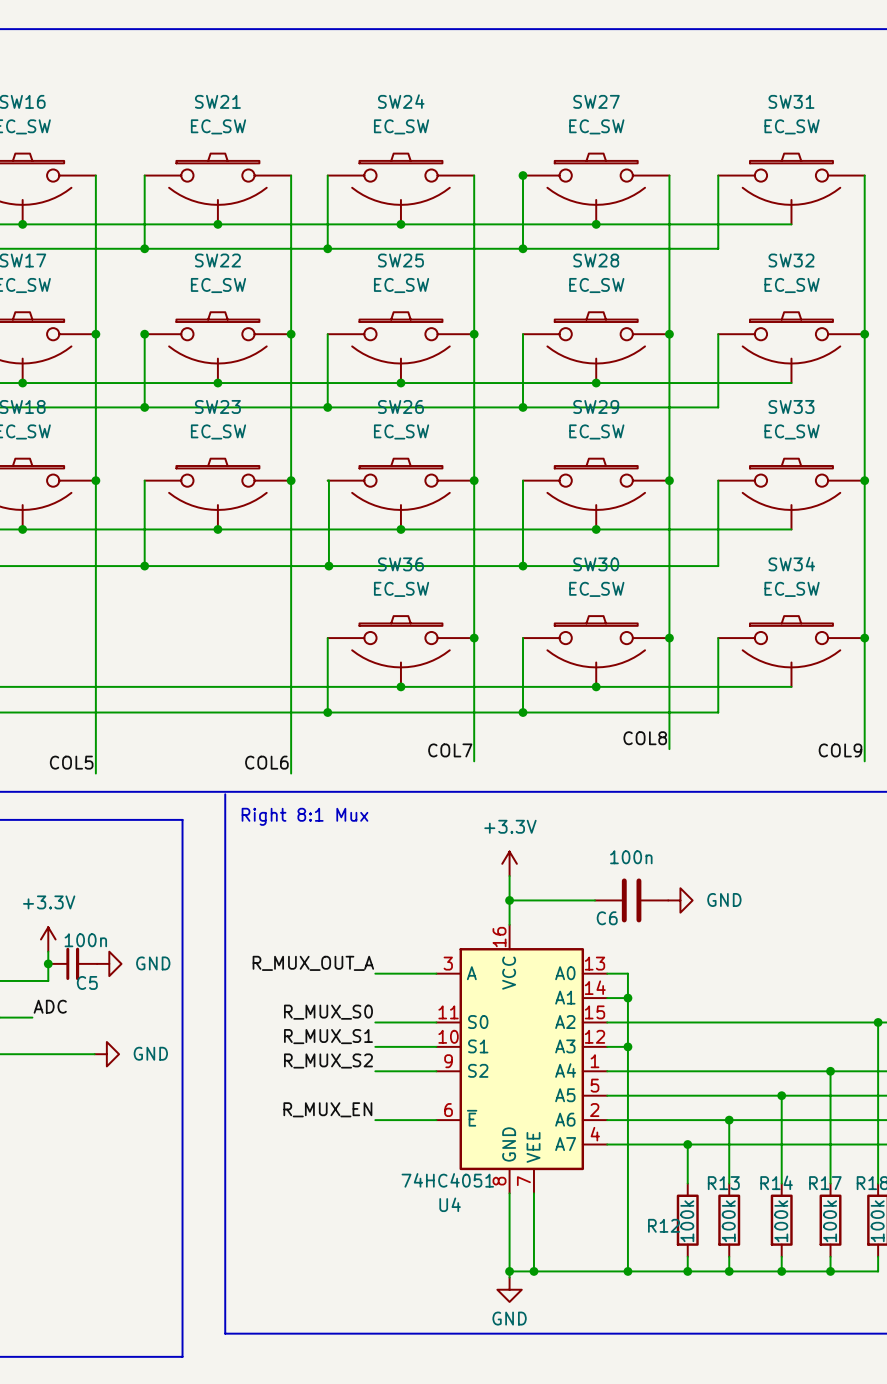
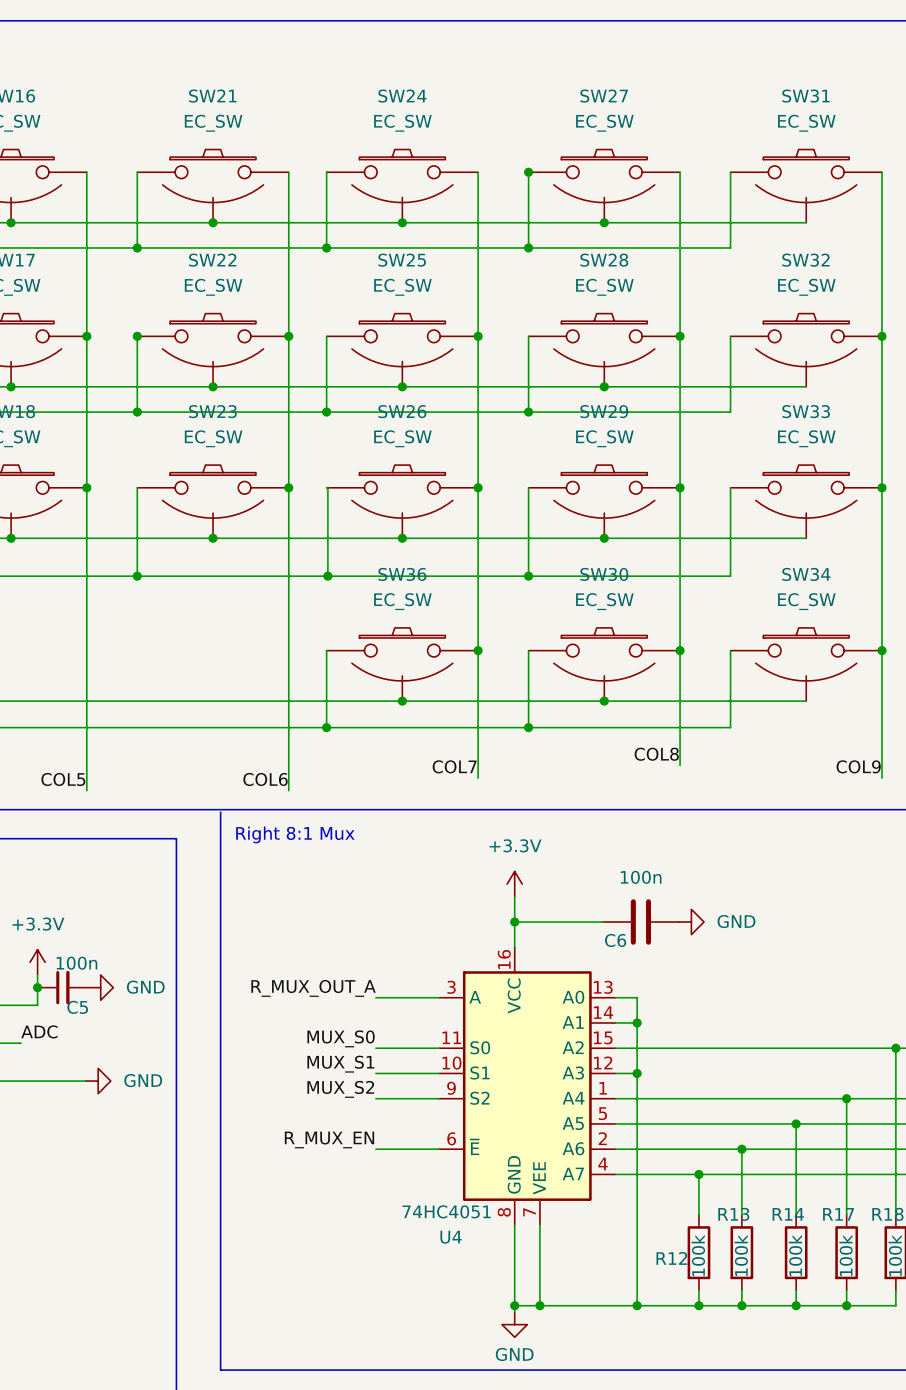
label: R_MUX_S0 (328, 1012) -> MUX_S0 (341, 1038)
label: R_MUX_S1 (328, 1036) -> MUX_S1 (340, 1064)
label: R_MUX_S2 (328, 1060) -> MUX_S2 (340, 1089)

